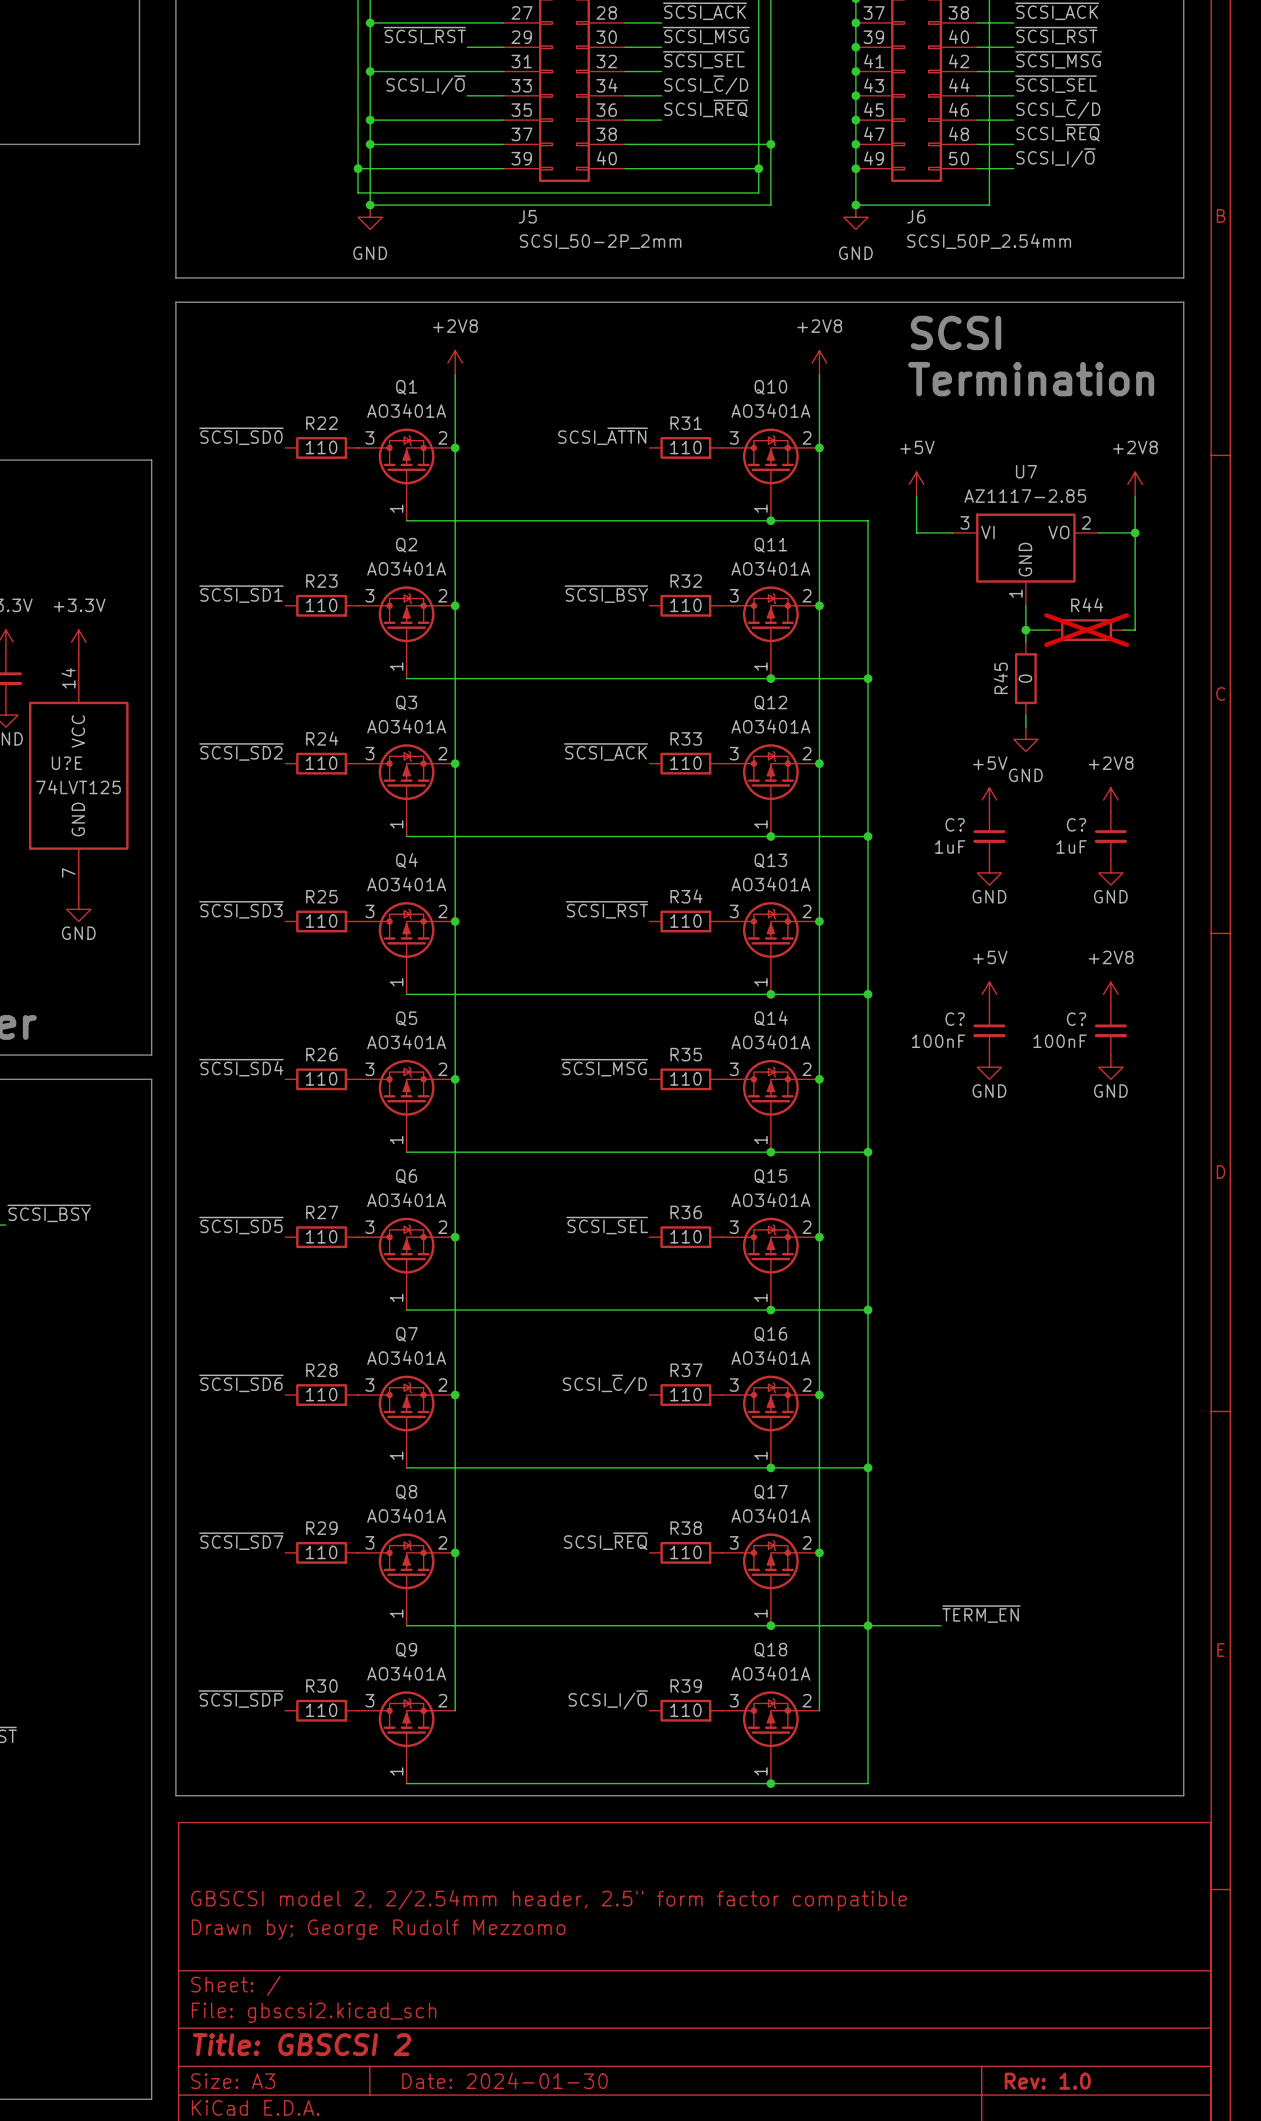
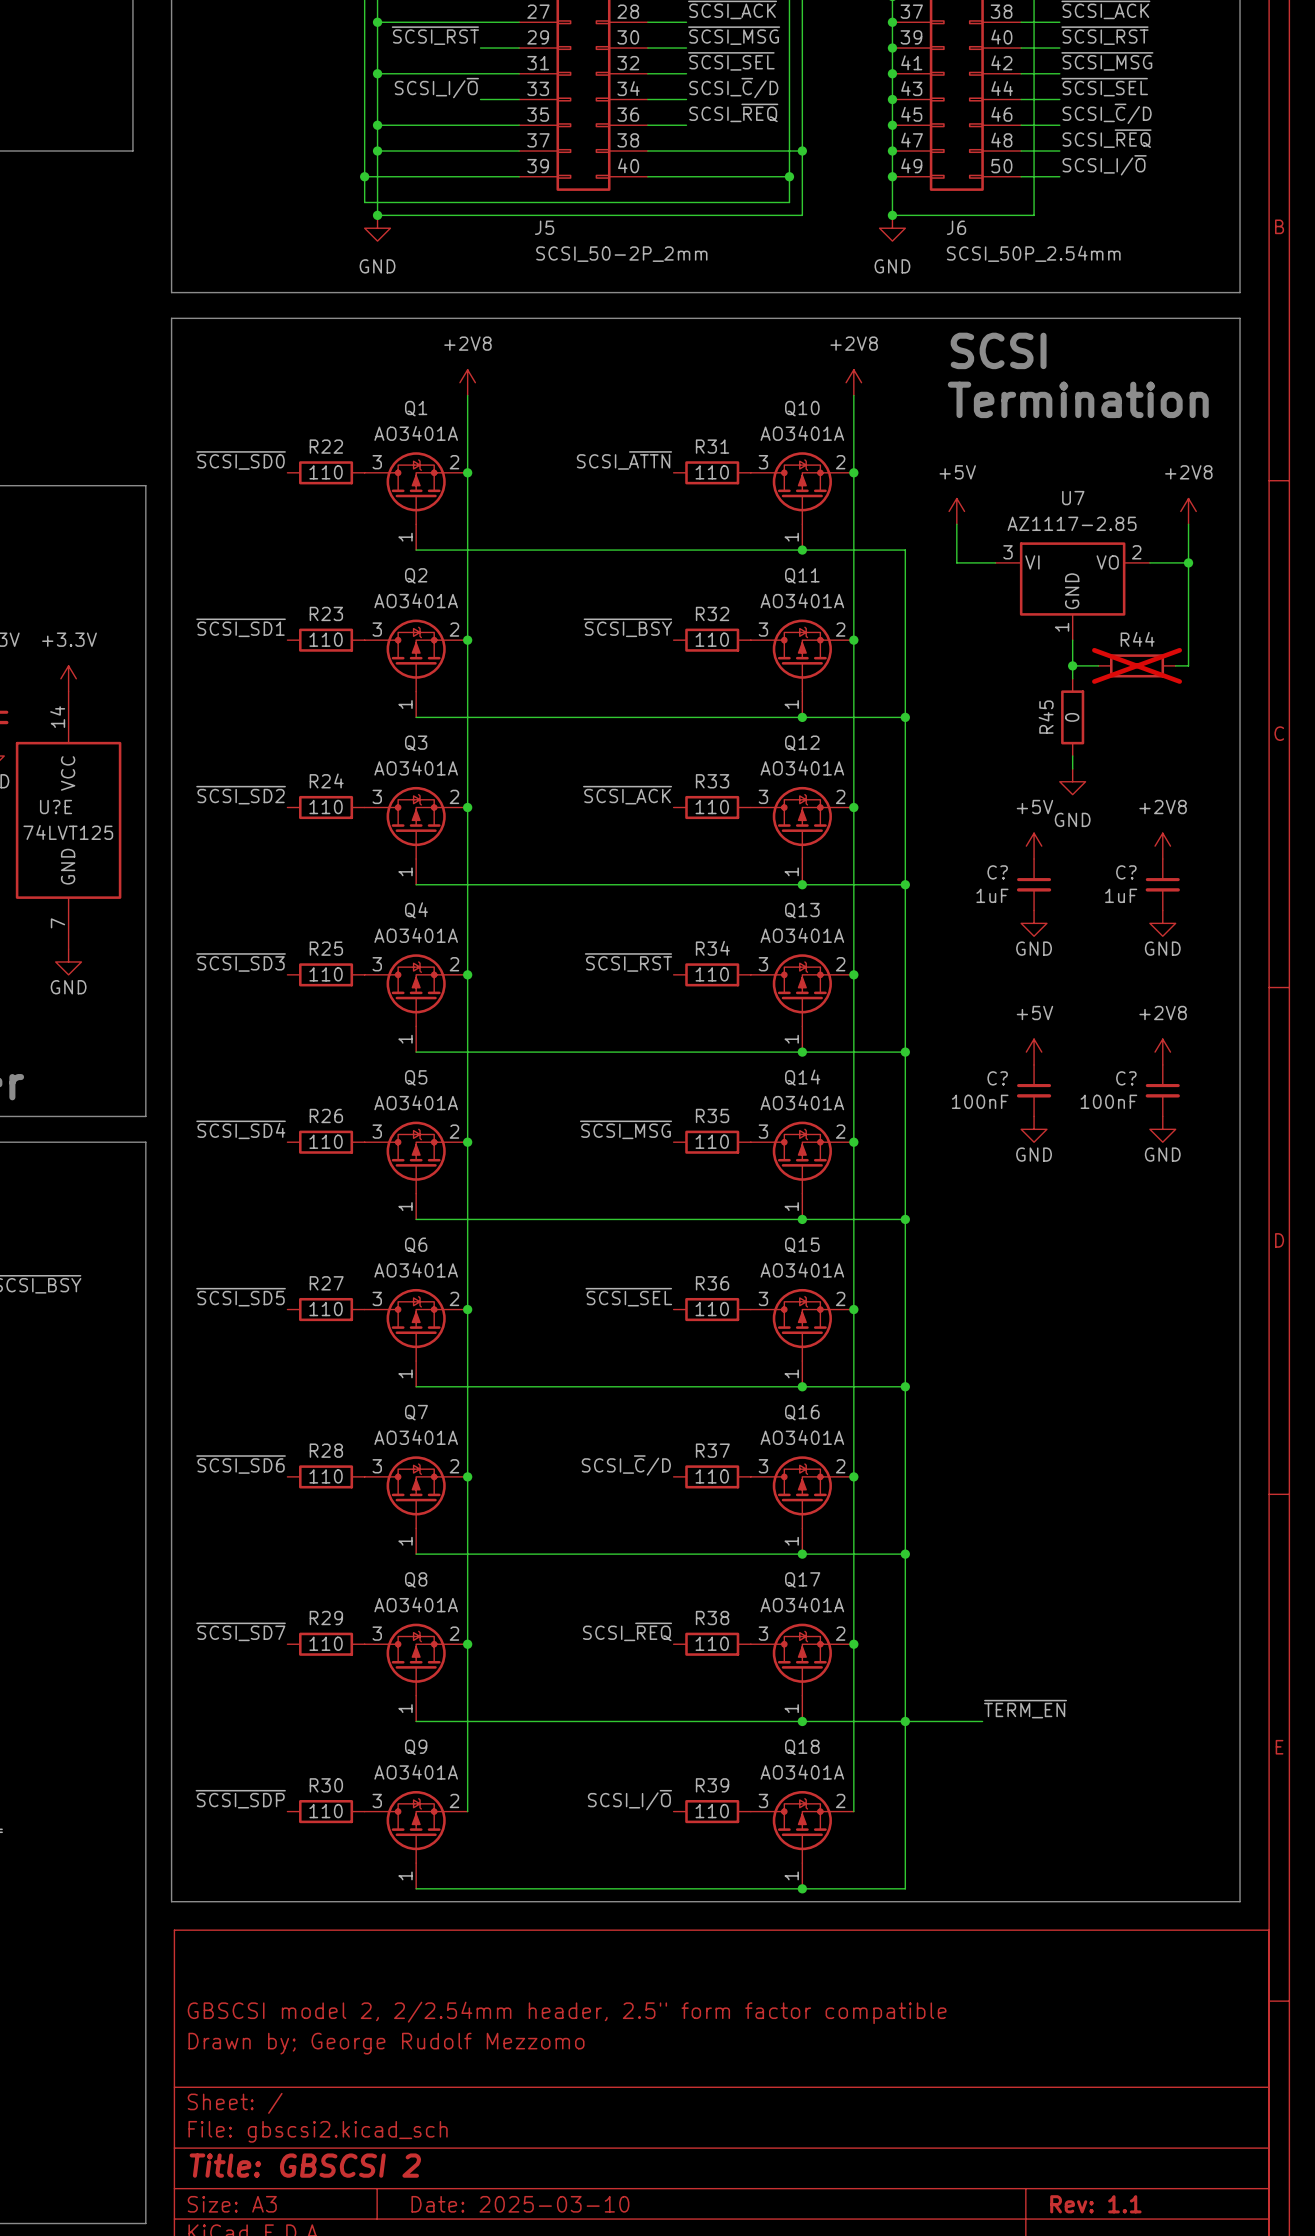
title block: Date: 2024-01-30 (504, 2080) -> Date: 2025-03-10 (520, 2204)
title block: Rev: 1.0 (1047, 2081) -> Rev: 1.1 (1095, 2204)

